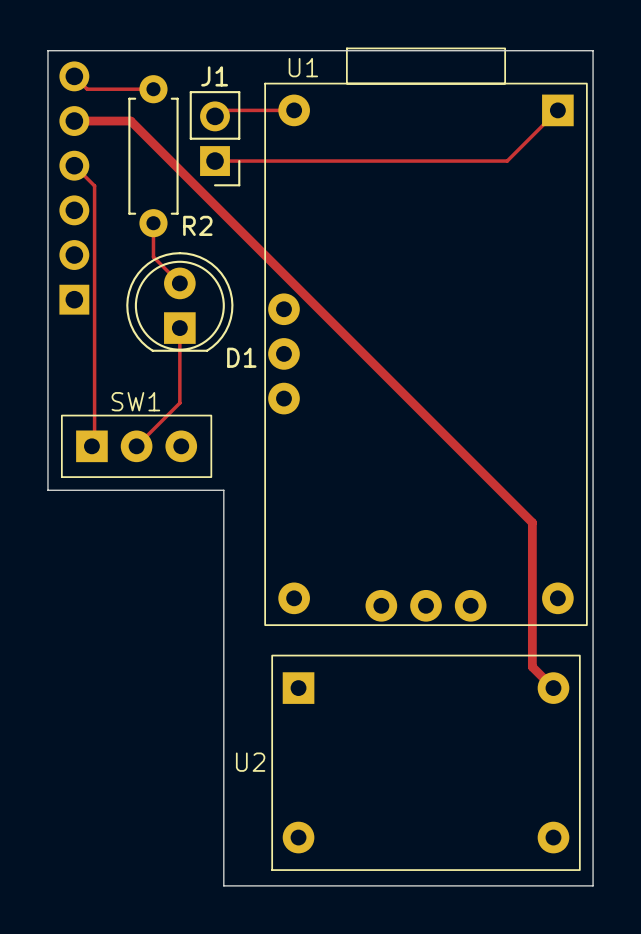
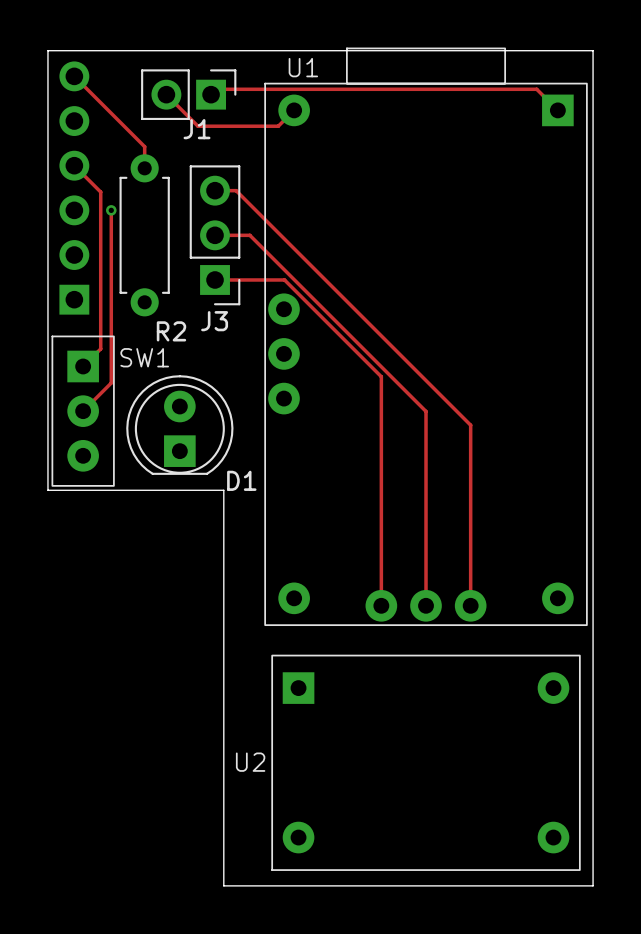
J1 name position: J1 (214, 76) -> J1 (197, 129)
track: (87, 89) (153, 89) -> (87, 89) (144, 146) (144, 168)
track: none -> (166, 94) (197, 126) (278, 126) (288, 116)
track: (294, 110) (220, 110) (215, 116) -> none
track: (557, 110) (507, 161) (215, 161) -> (557, 110) (536, 89) (216, 89) (211, 94)
track: (84, 121) (130, 121) (532, 522) (532, 666) (553, 688) -> none
J1 rotation: 0° (215, 138) -> 90° counterclockwise (188, 94)
R2 position: (153, 156) -> (144, 235)
track: (94, 185) (94, 443) -> (94, 185) (100, 192) (100, 348) (83, 366)
track: none -> (215, 190) (236, 190) (470, 425) (470, 605)
track: none -> (111, 210) (111, 383) (83, 411)
via: none -> (111, 210)
track: (153, 223) (153, 257) (179, 283) -> none
R2 name position: R2 (197, 225) -> R2 (171, 331)
track: none -> (215, 235) (249, 235) (426, 411) (426, 605)
J3: none -> (215, 235)
track: none -> (215, 279) (284, 279) (381, 376) (381, 605)
D1 position: (179, 301) -> (179, 425)
track: (179, 328) (179, 403) (136, 446) -> none
SW1 name position: SW1 (135, 401) -> SW1 (144, 357)
SW1 rotation: 0° (136, 446) -> 90° clockwise (83, 411)

